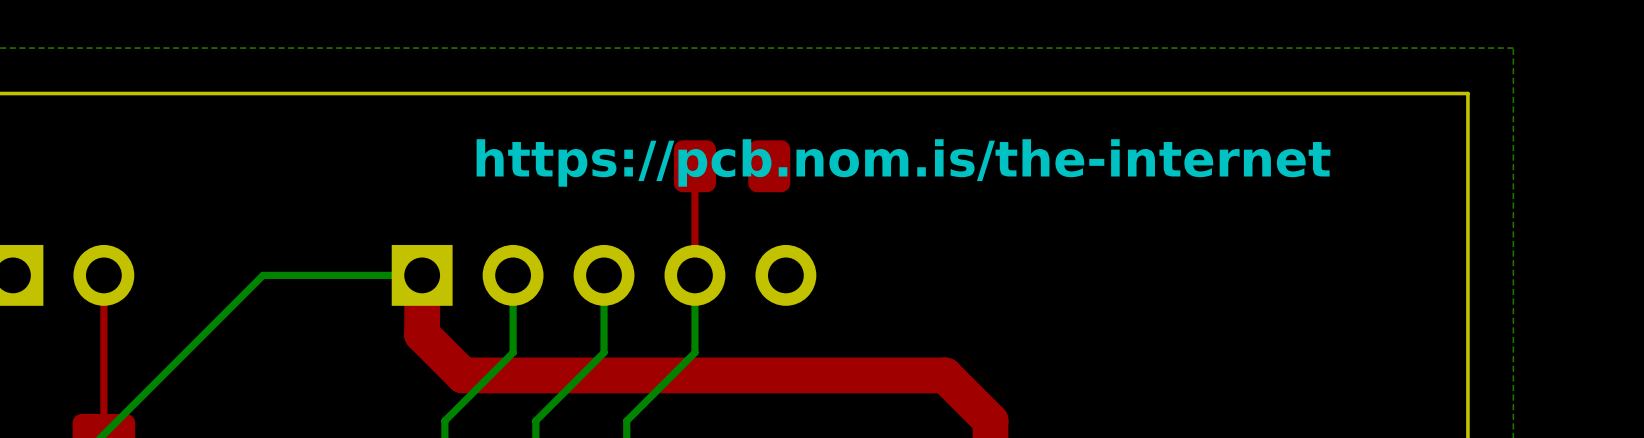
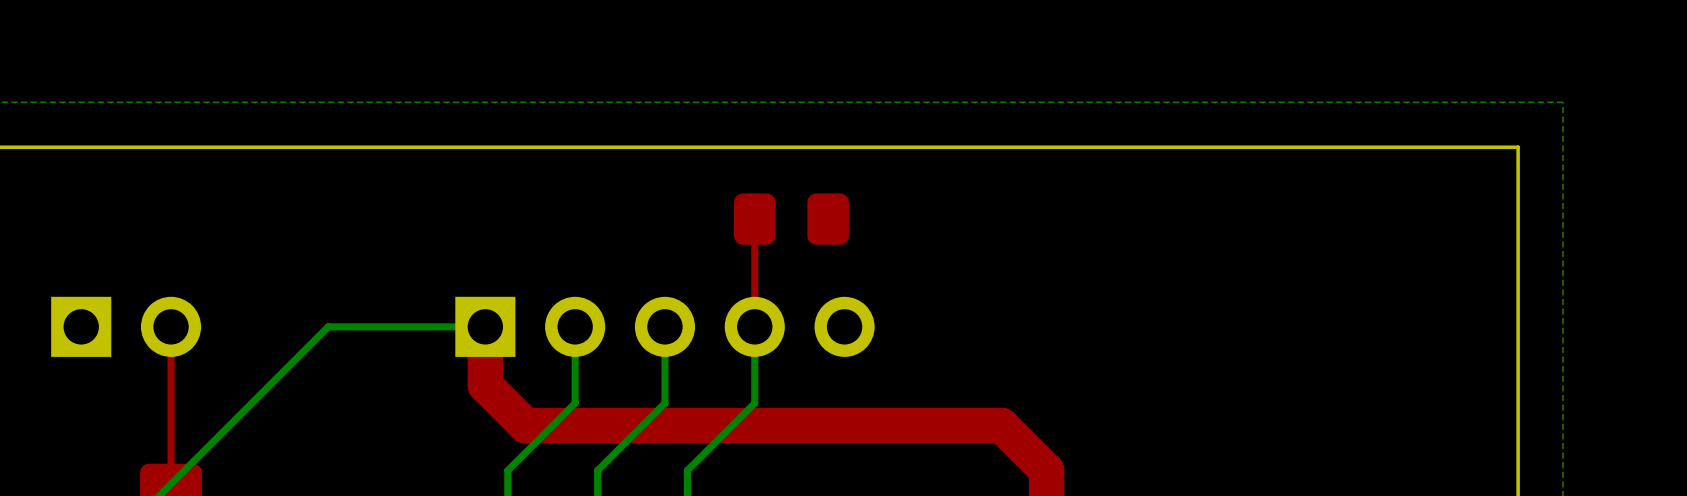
text: https://pcb.nom.is/the-internet (903, 162) -> none

